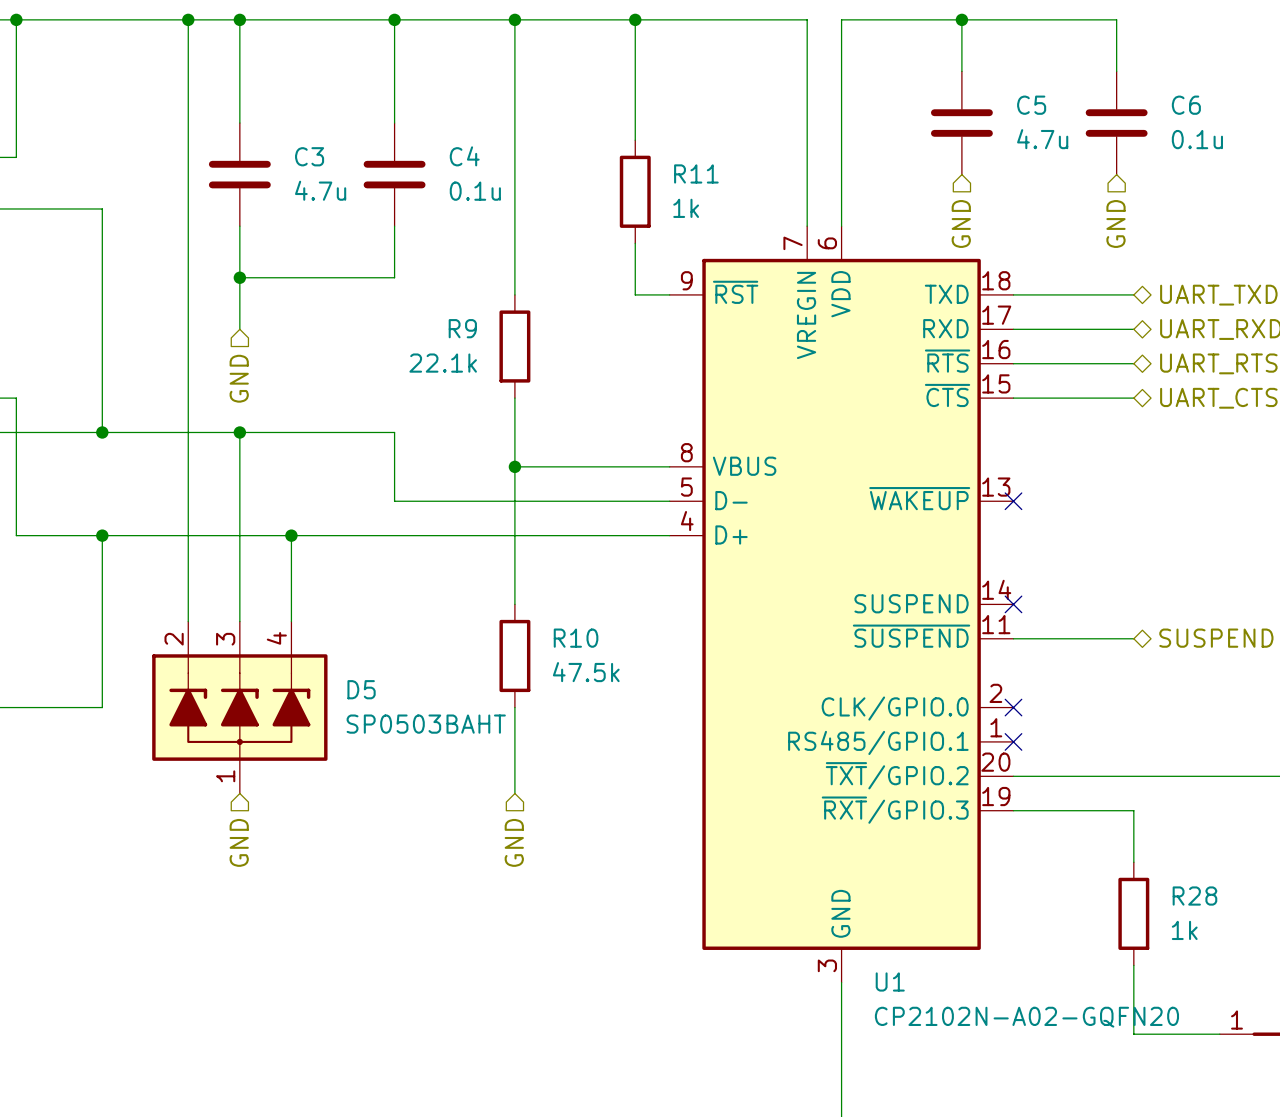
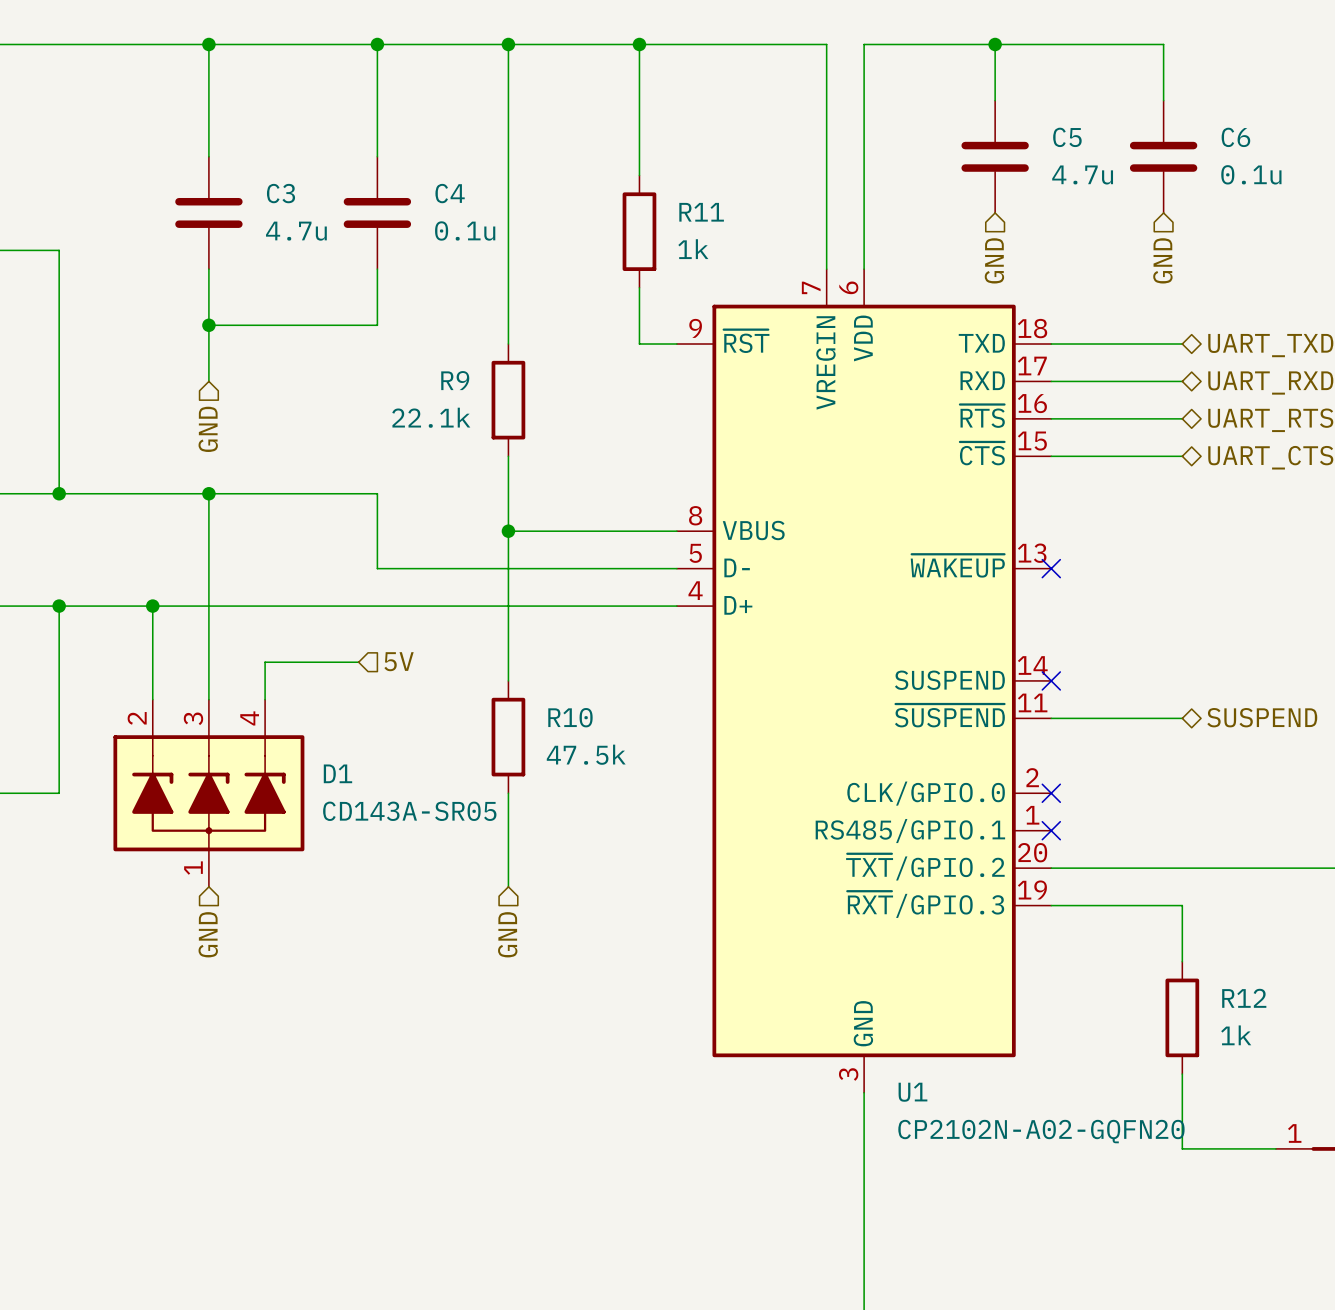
wire: (188, 19) (188, 535) -> none
junction: (188, 19) -> none
junction: none -> (152, 606)
wire: (291, 535) (291, 587) -> (358, 662) (265, 662)
junction: (291, 535) -> none
hierarchical label: none -> 5V (399, 661)
D5 name: D5 (361, 689) -> D1 (337, 773)
D5 value: SP0503BAHT (426, 724) -> CD143A-SR05 (409, 811)
R28 name: R28 (1194, 896) -> R12 (1244, 998)

